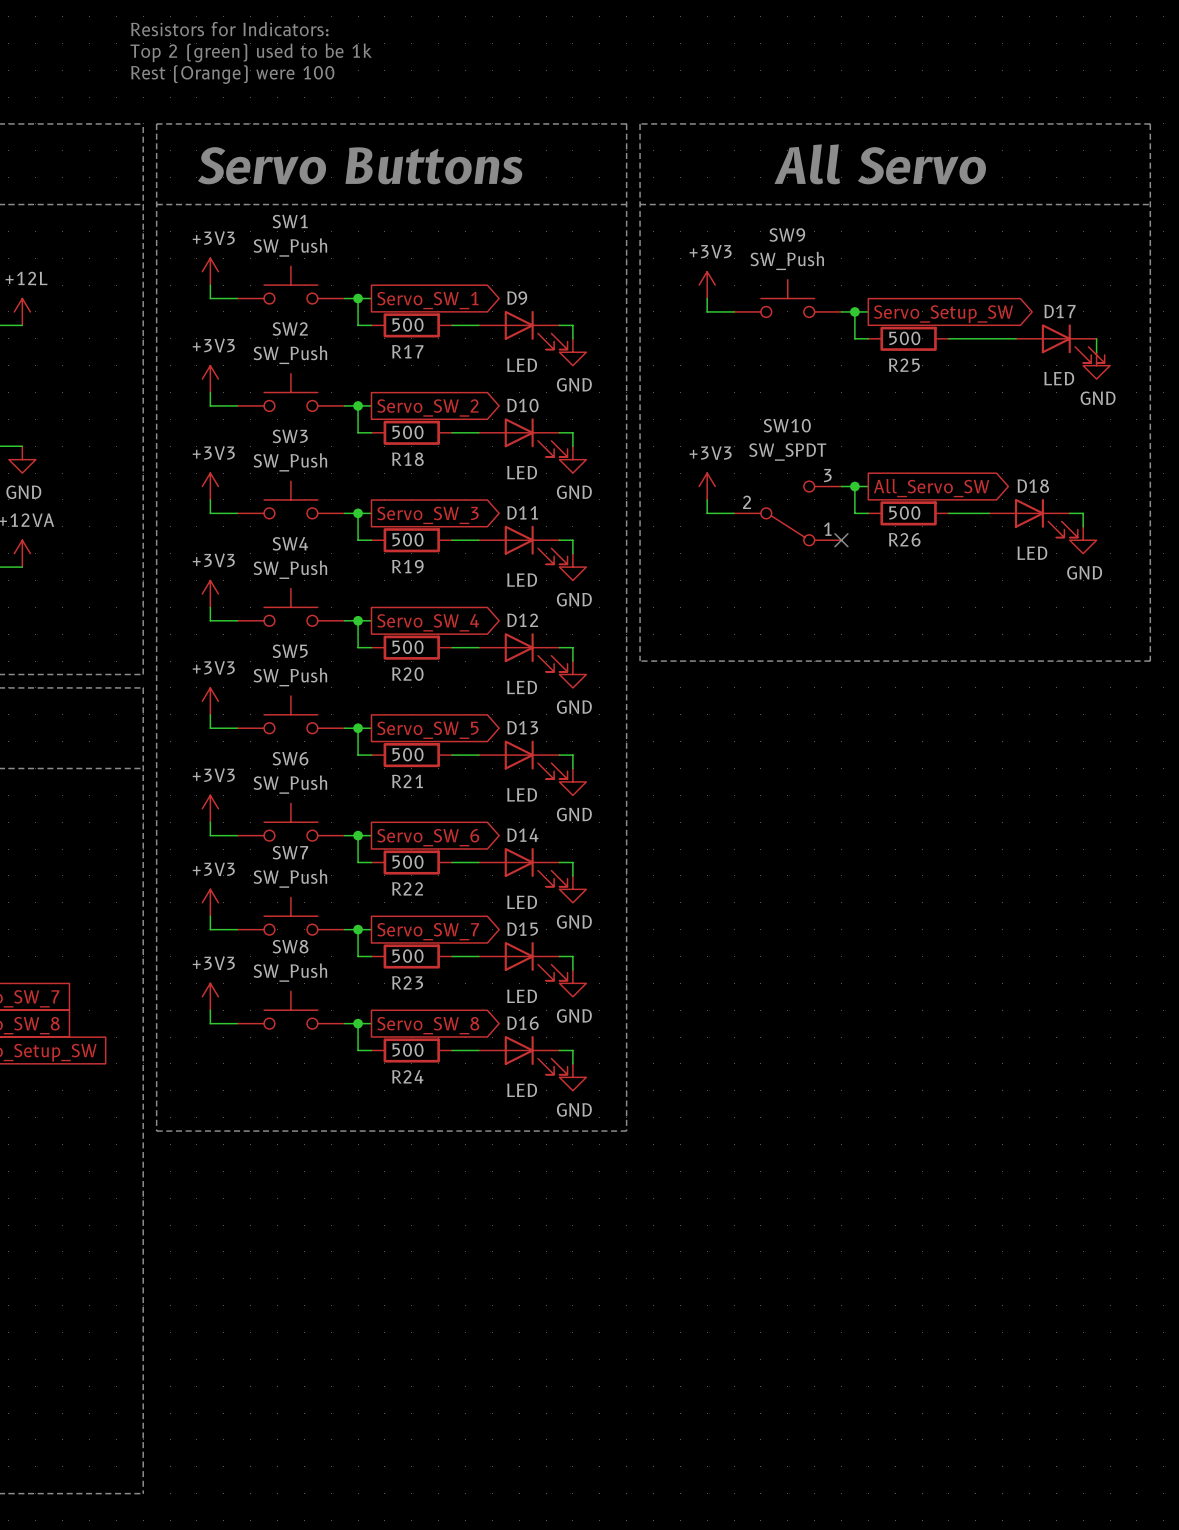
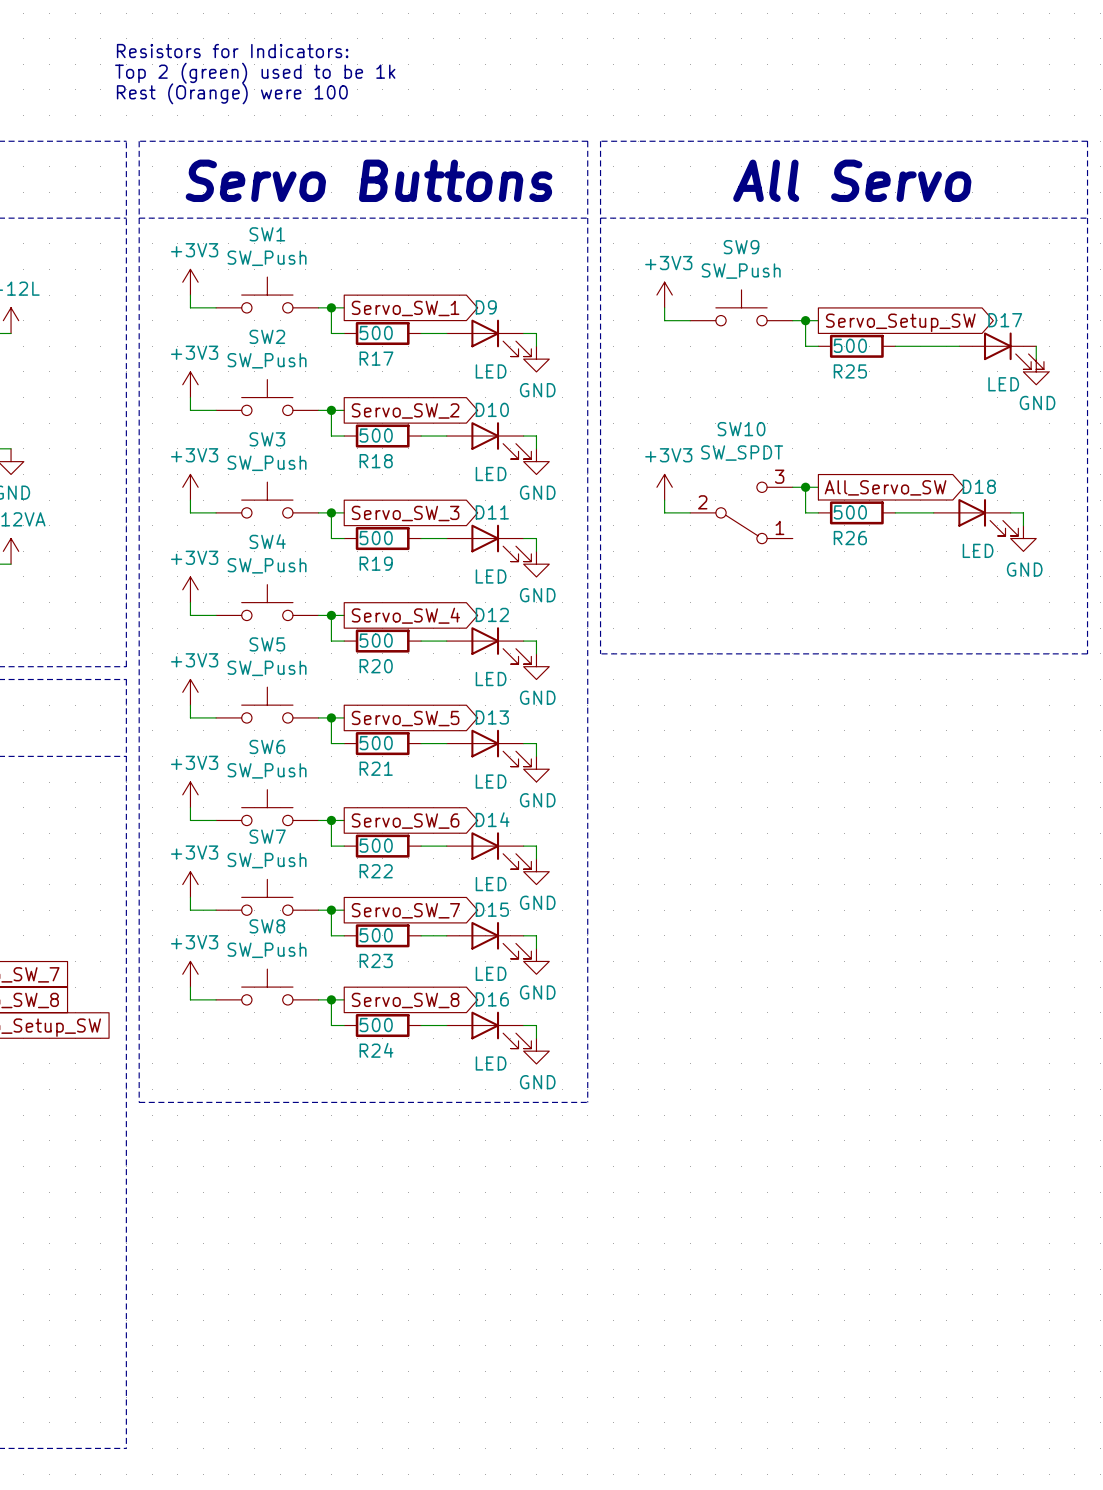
no-connect mark: (841, 540) -> none

